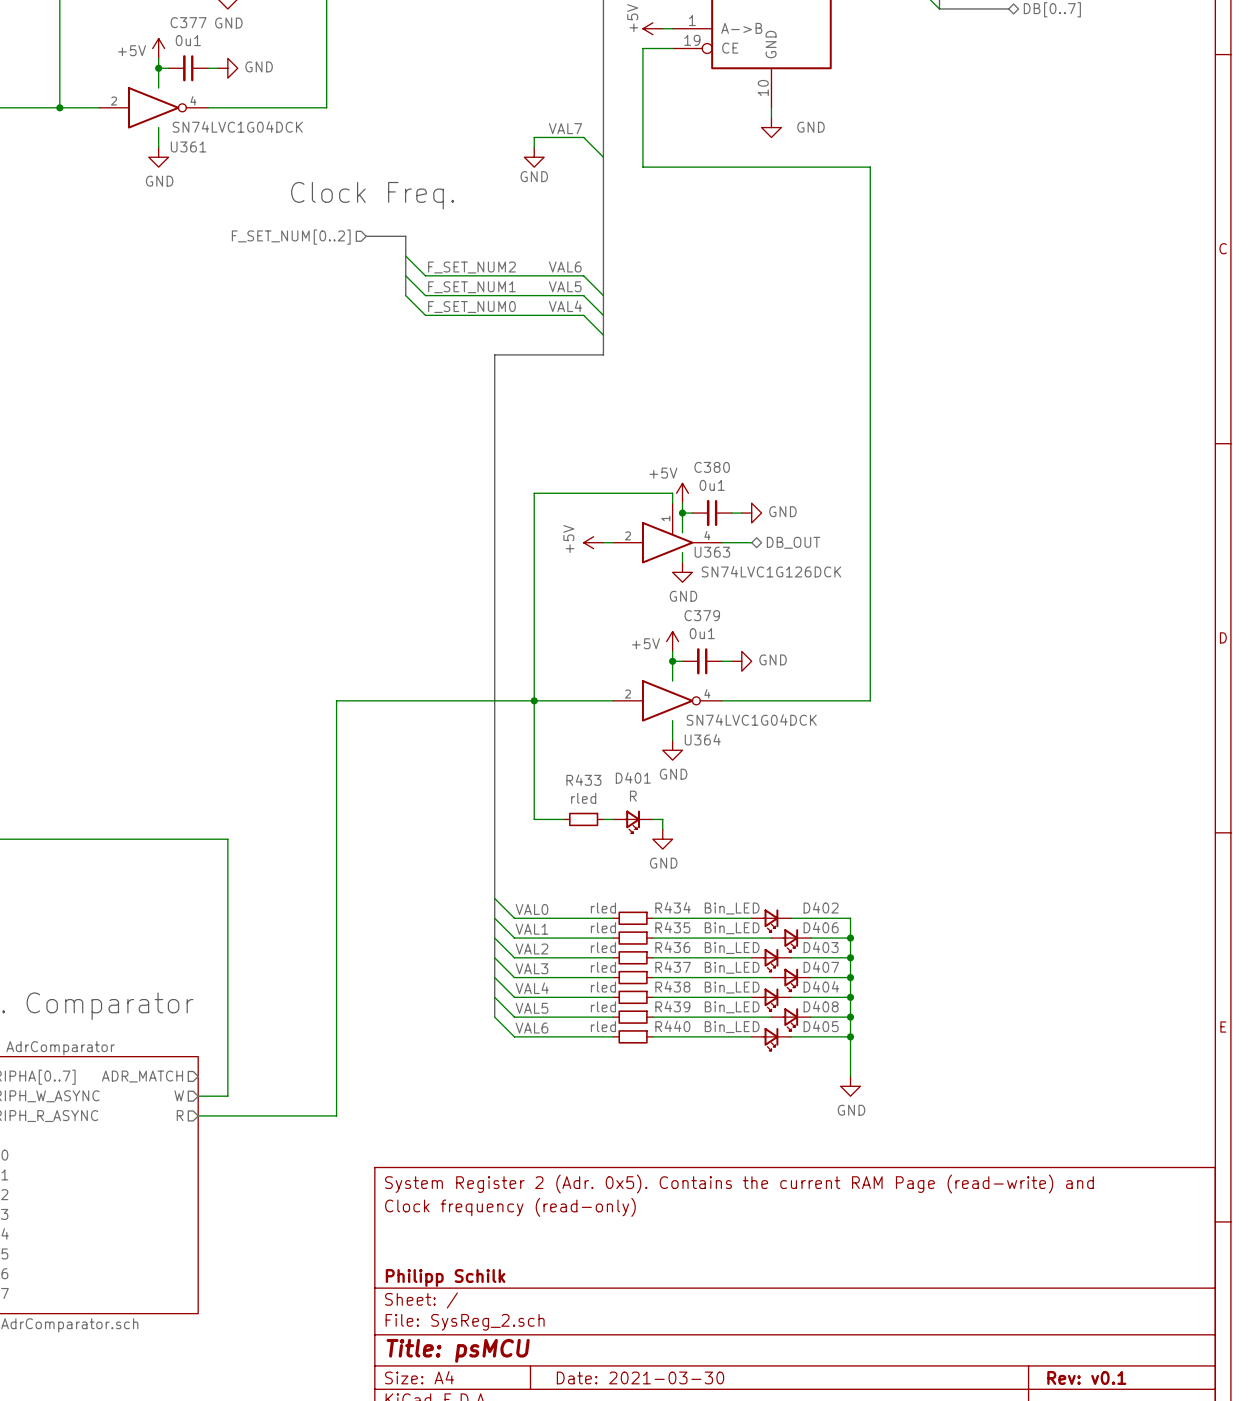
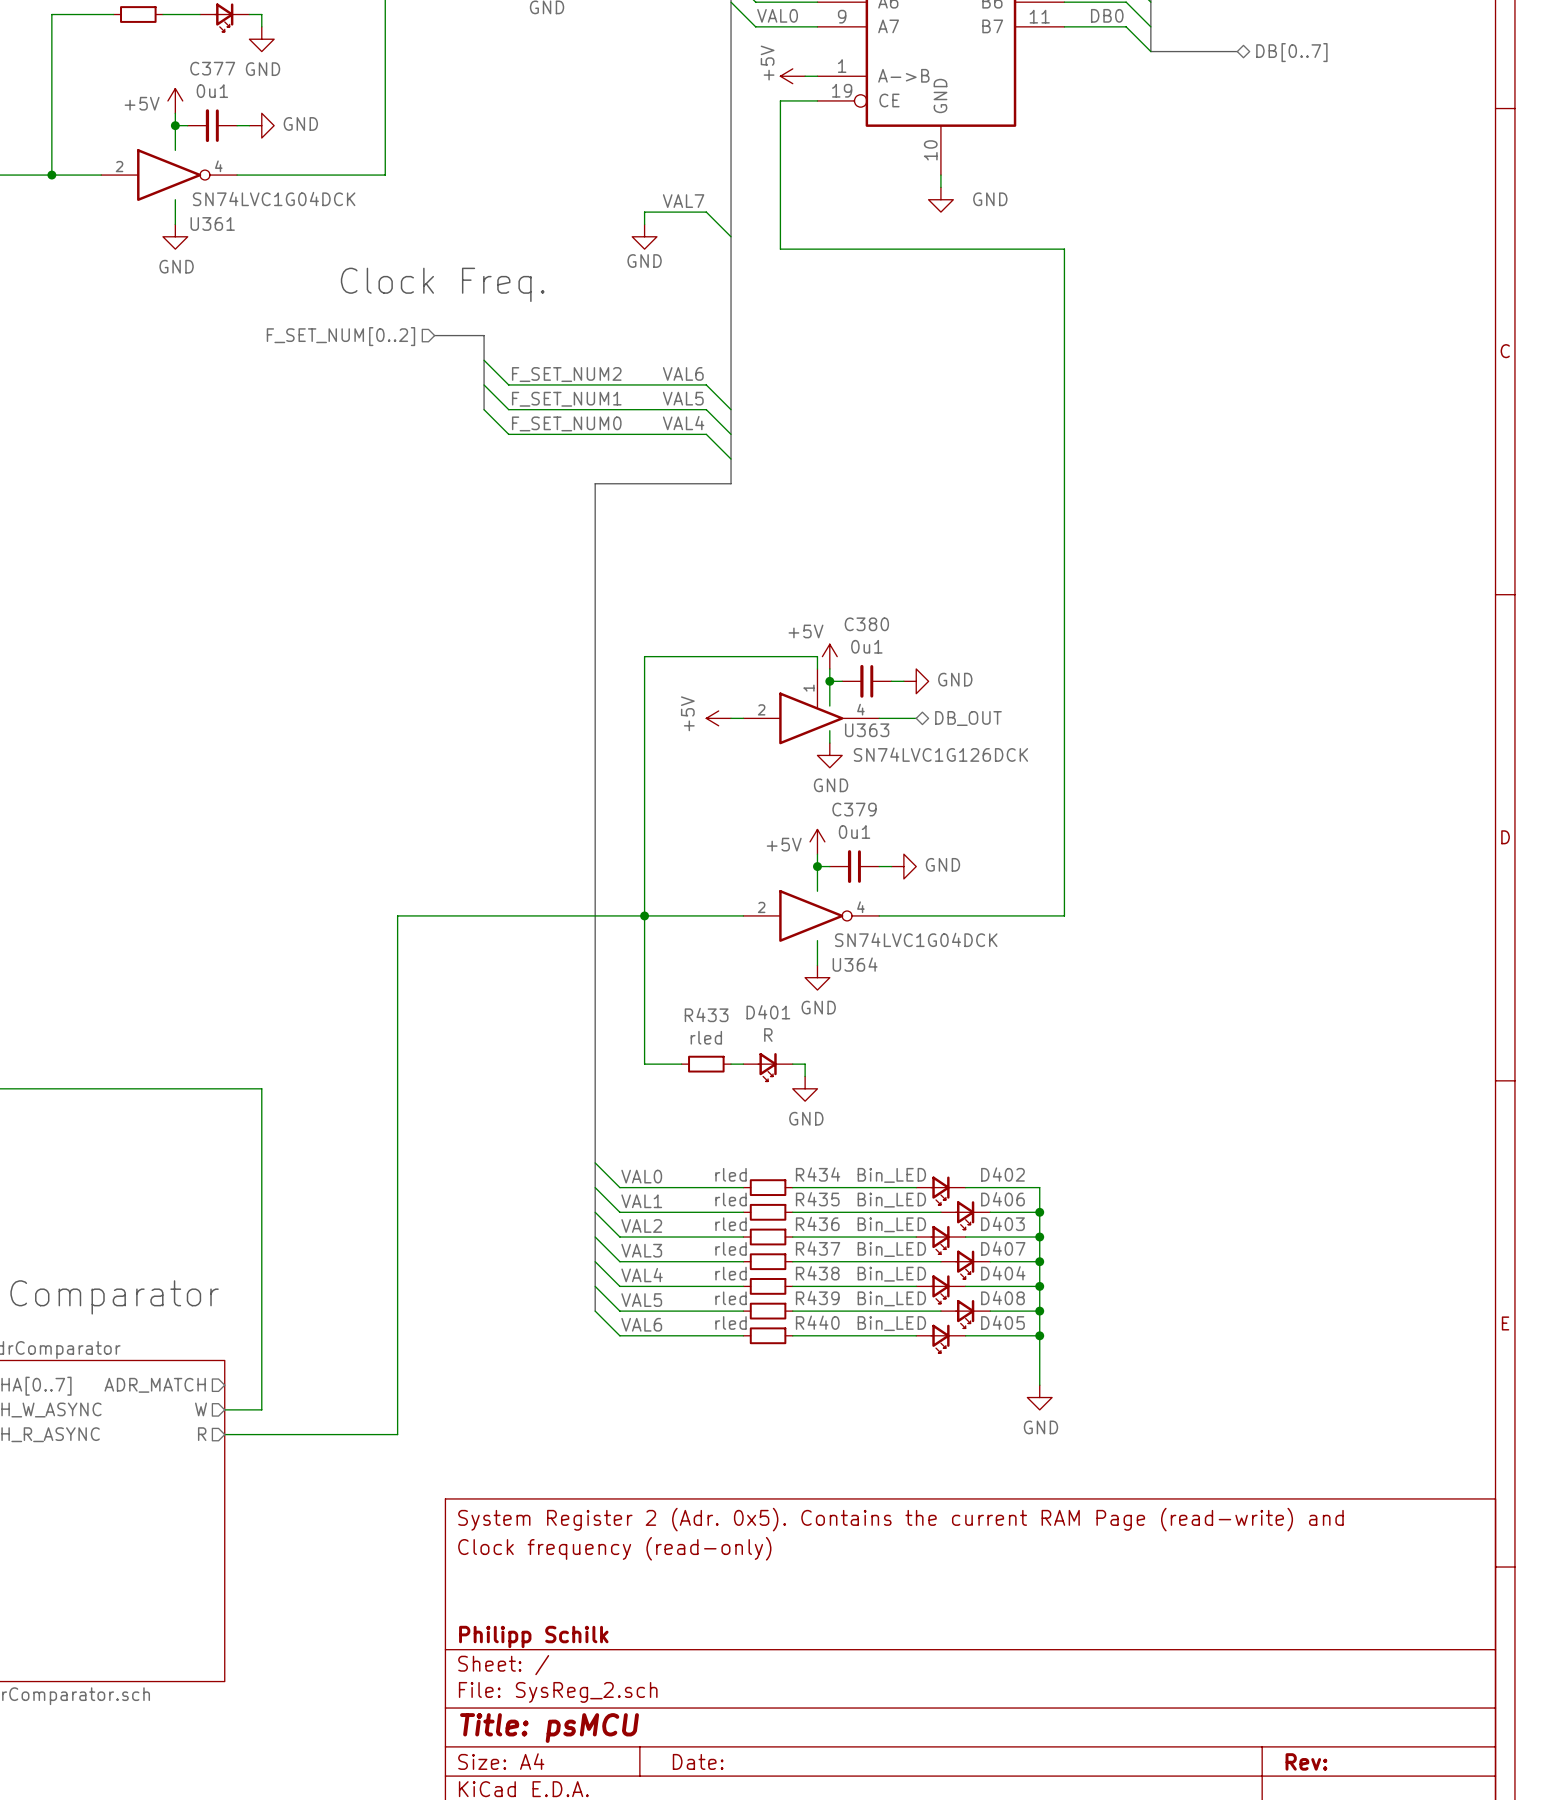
title block: Date: 2021-03-30 (640, 1377) -> Date: (698, 1761)
title block: Rev: v0.1 (1086, 1377) -> Rev: (1306, 1761)

